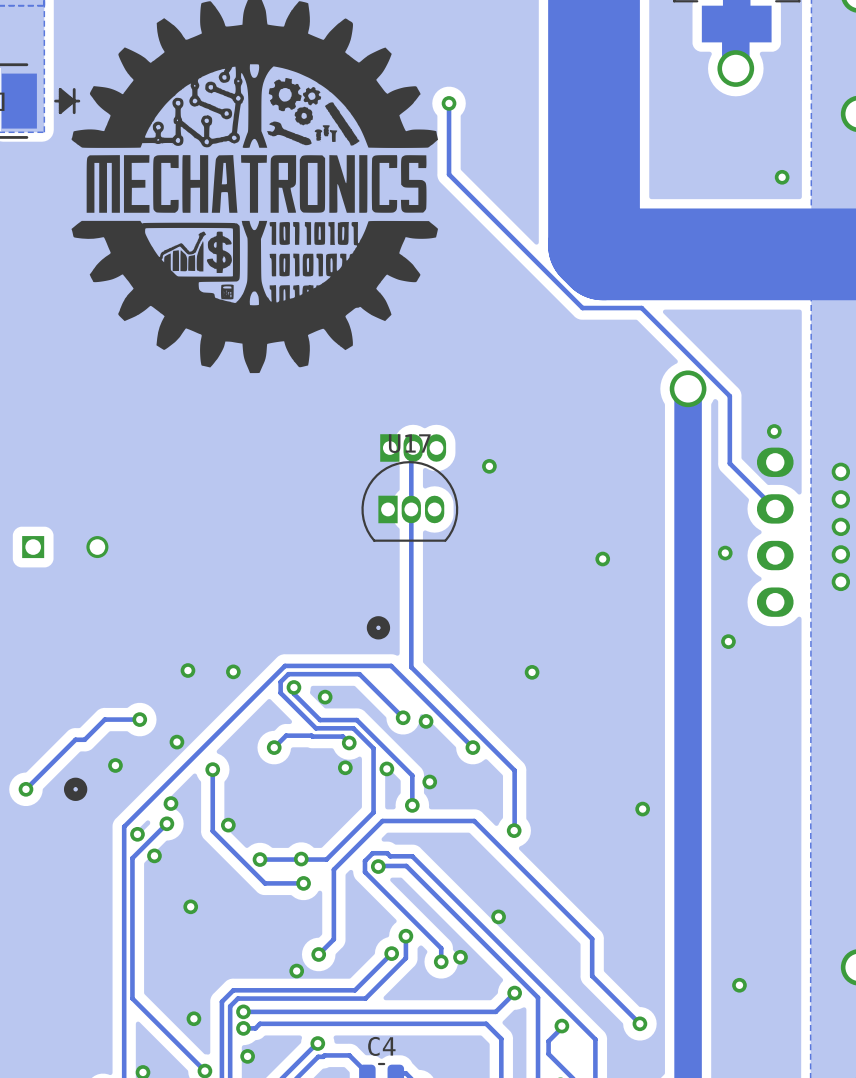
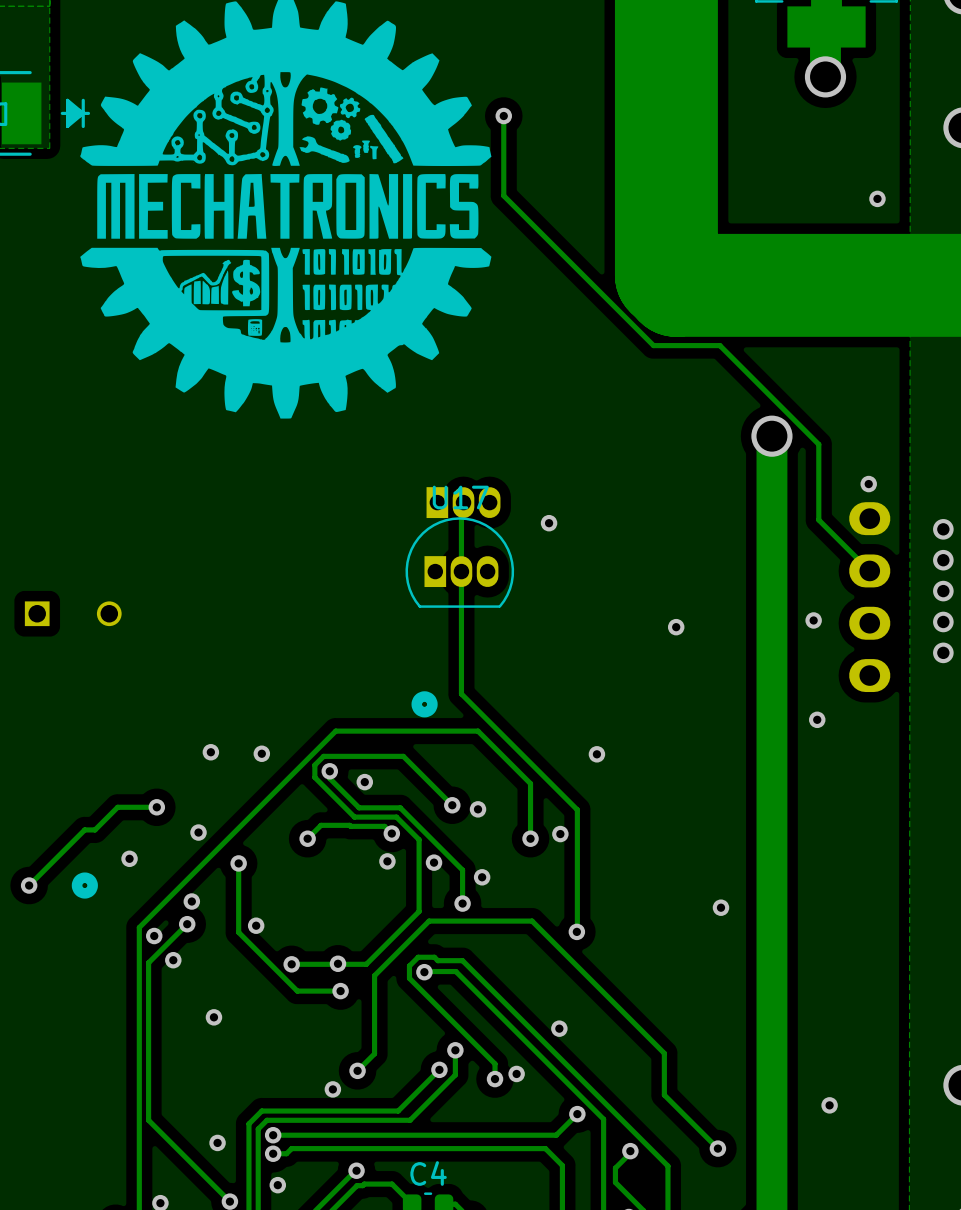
track: (411, 618) (411, 667) (514, 770) -> (461, 693) (577, 809) (577, 864)
track: (285, 665) (391, 665) (472, 747) -> (319, 747) (335, 731) (478, 731) (530, 783) (530, 838)
via: none -> (560, 834)

